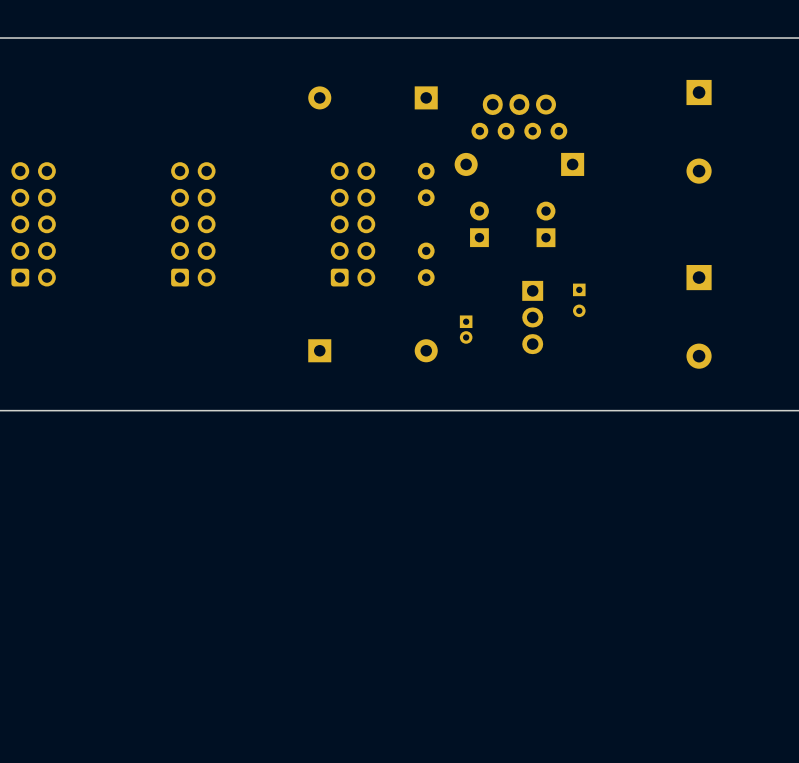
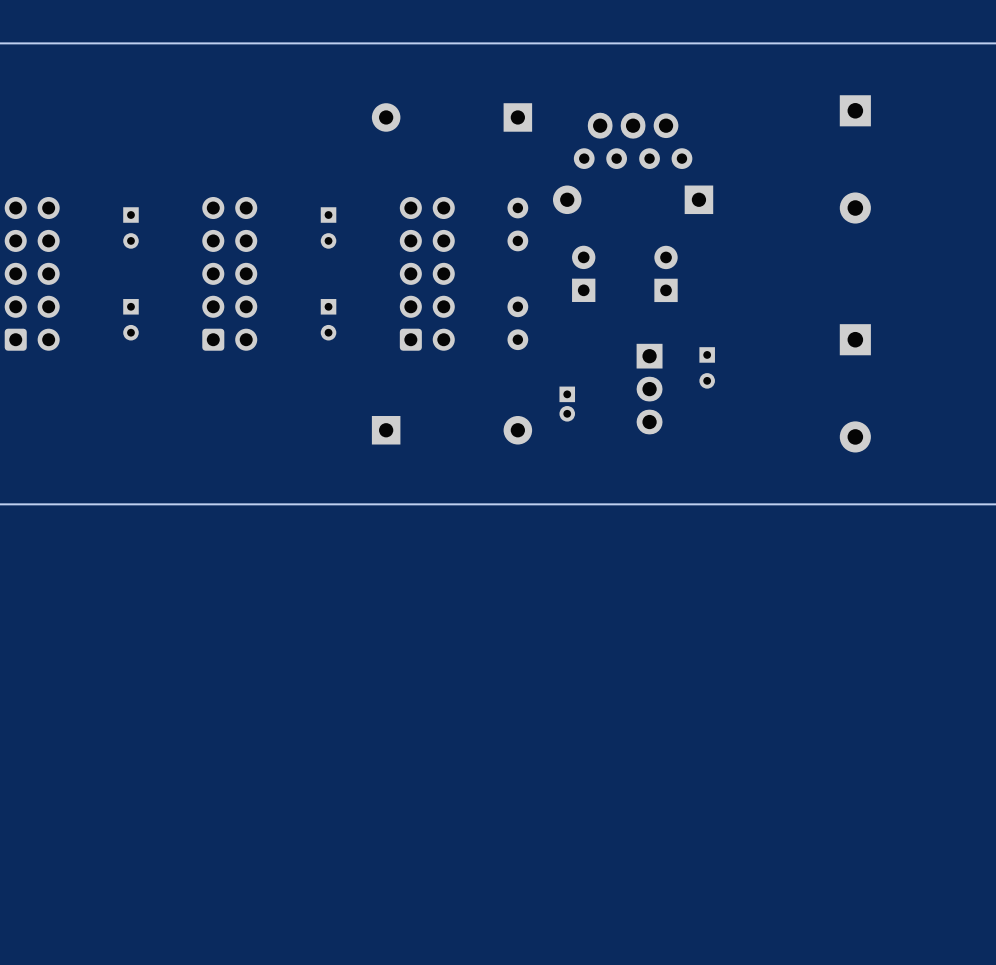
part: none -> (130, 227)
part: none -> (328, 227)
part: none -> (130, 319)
part: none -> (328, 319)

